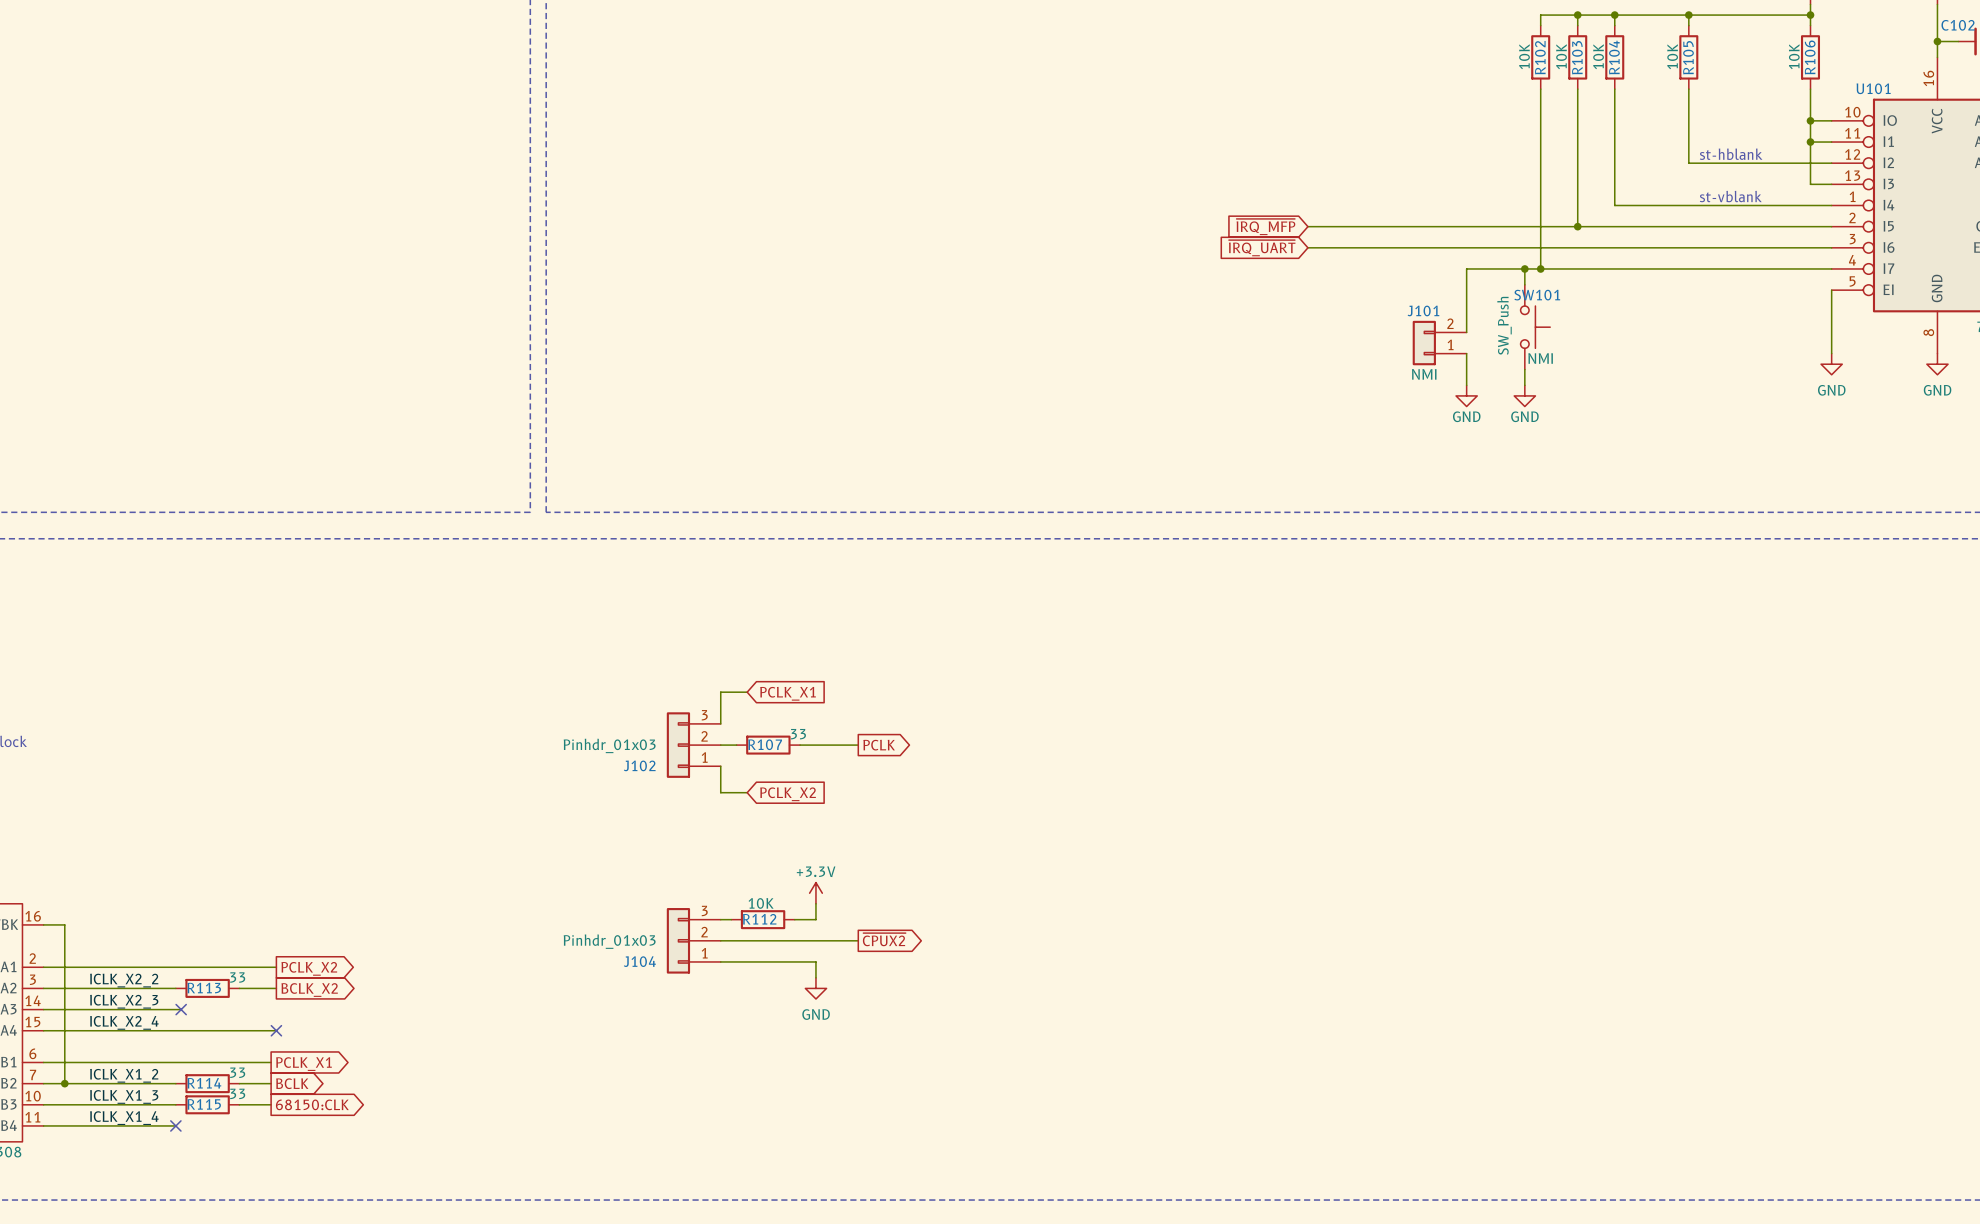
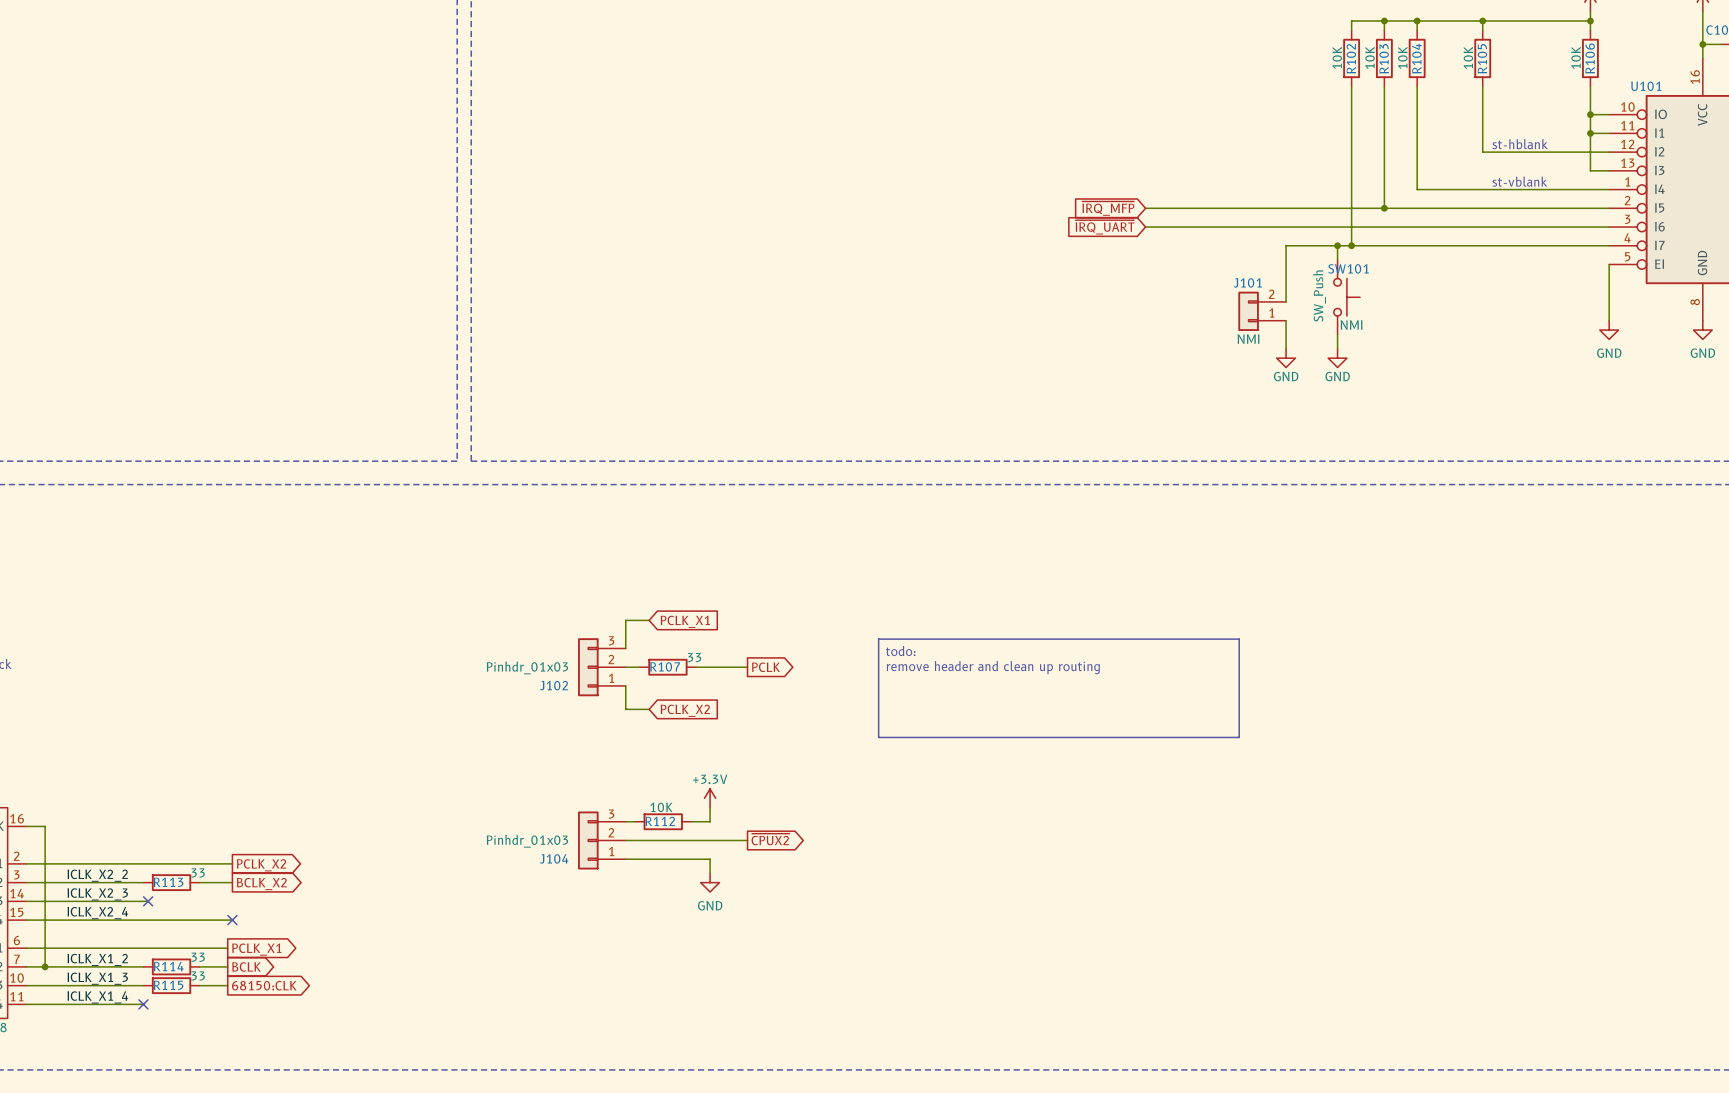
line: none -> (878, 639) (1239, 639) (1239, 737) (878, 737) (878, 639)
text: none -> todo: (900, 651)
text: none -> remove header and clean up routing (993, 667)

